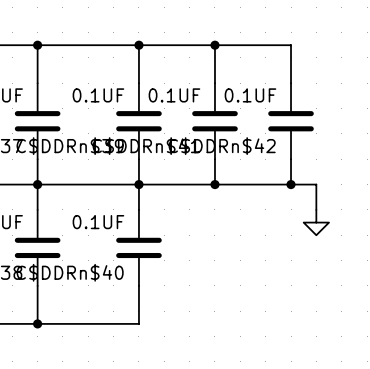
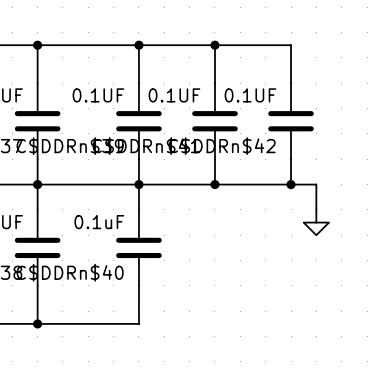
C$DDRn$40 value: 0.1UF (98, 222) -> 0.1uF (99, 222)

